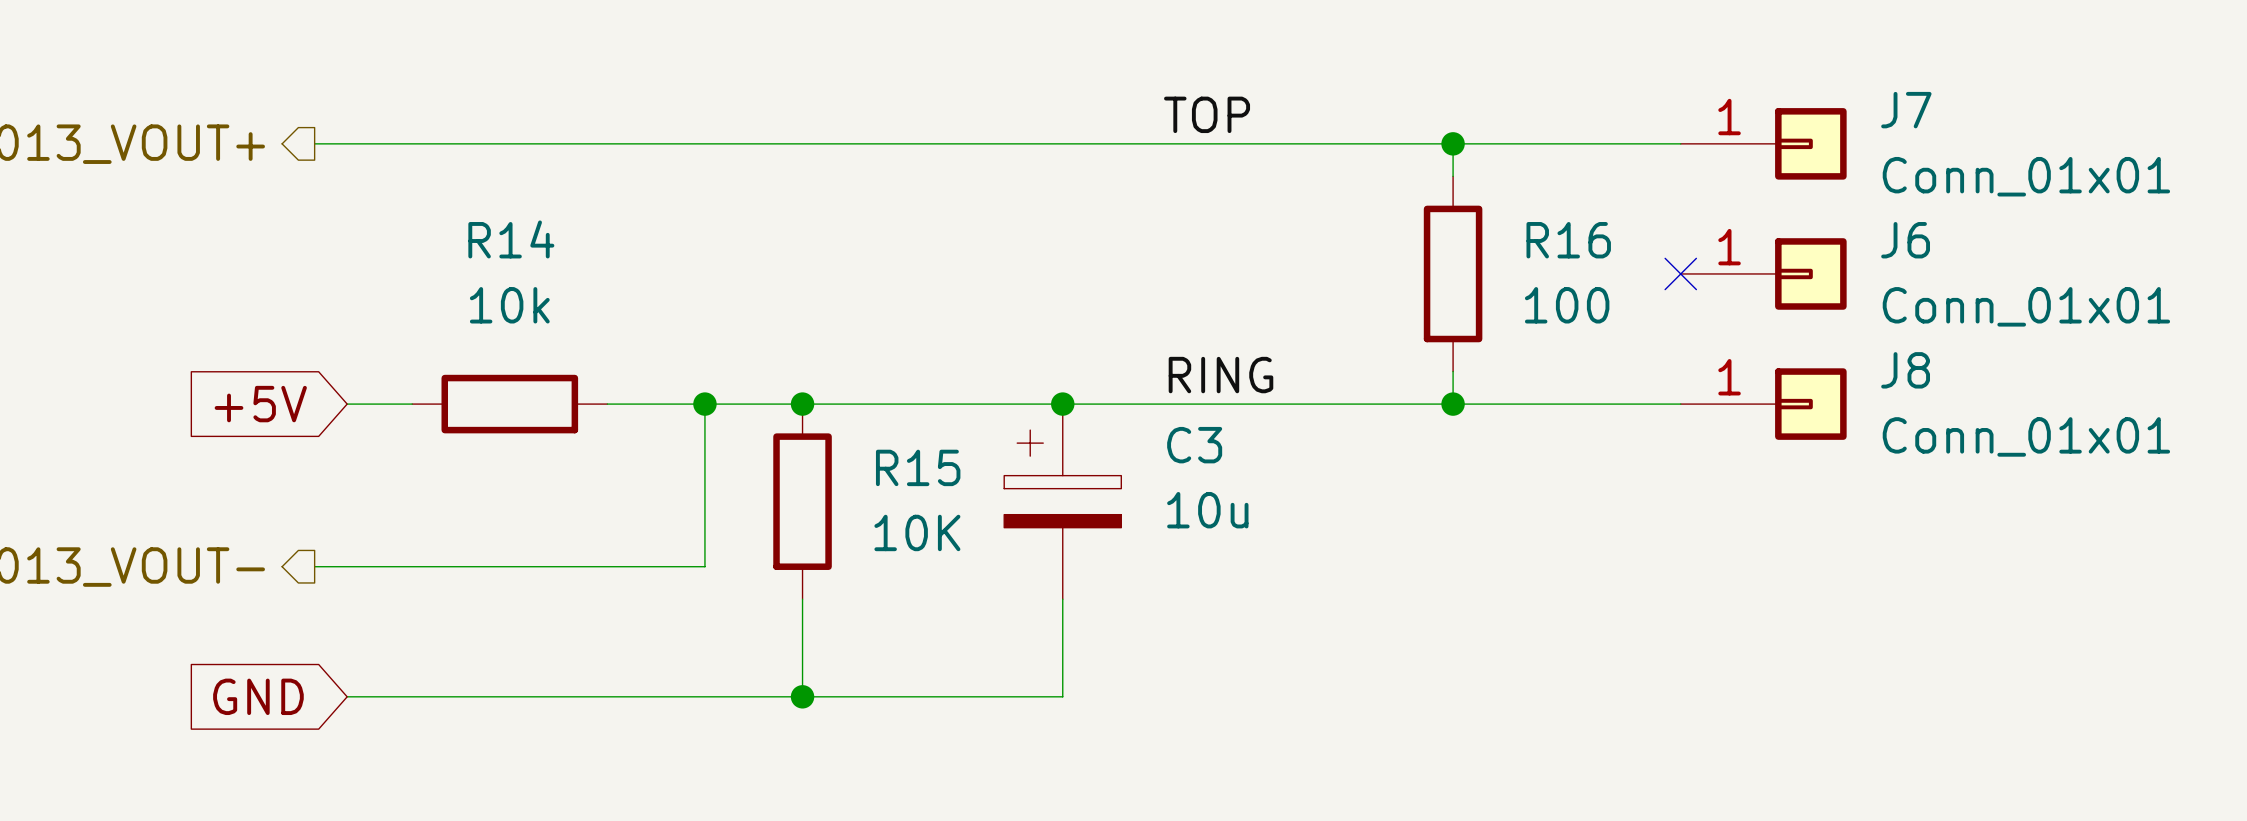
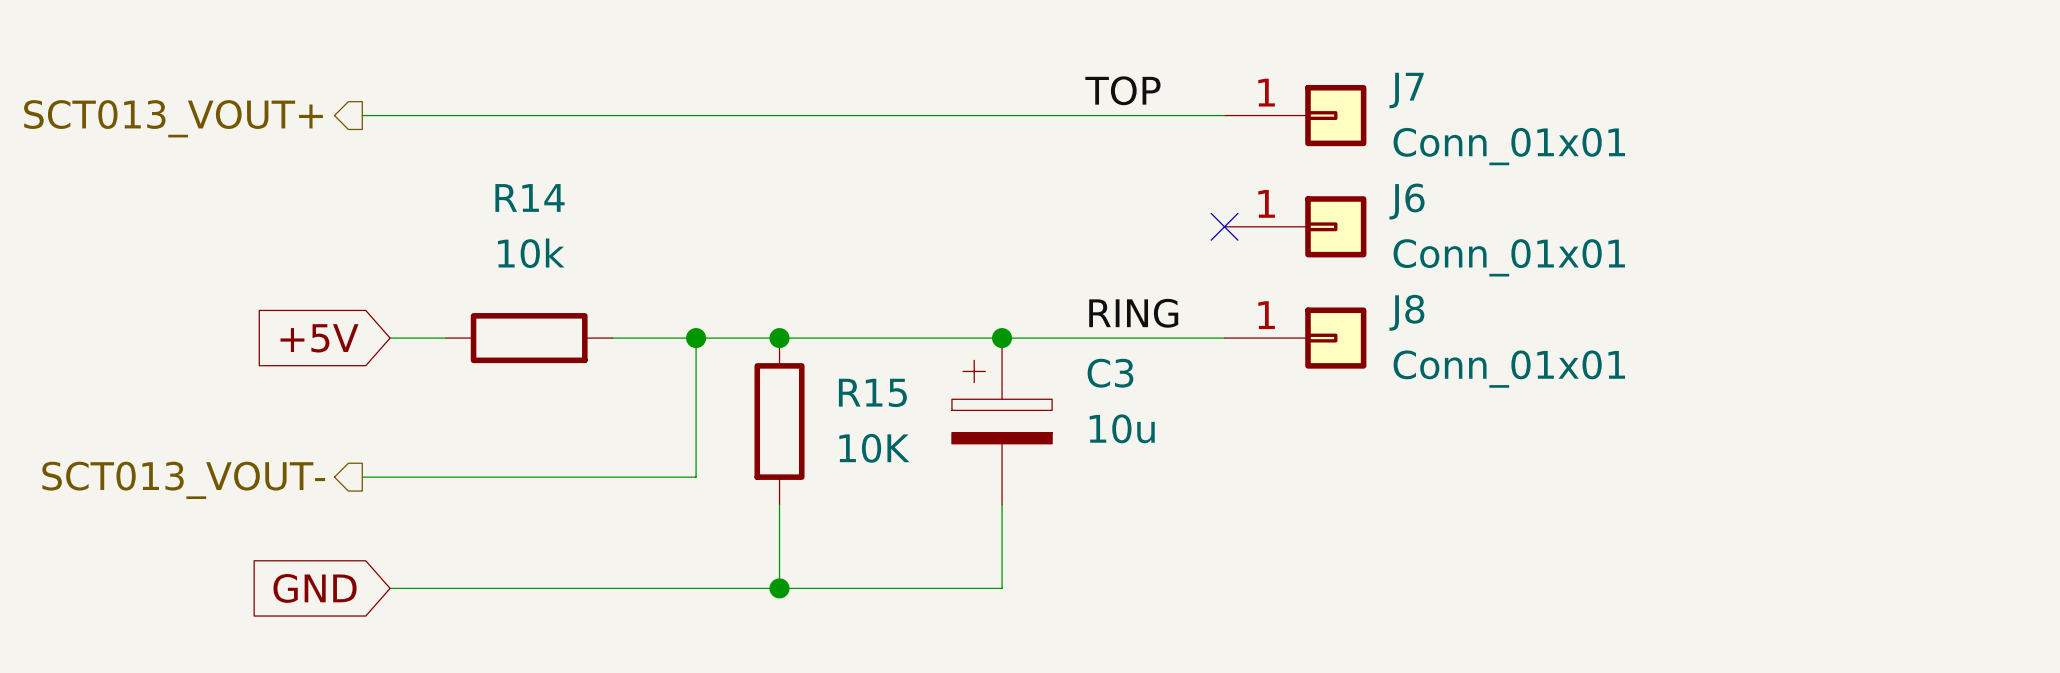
wire: (1322, 143) (1680, 143) -> none
junction: (1453, 143) -> none
J7 position: (1763, 143) -> (1295, 115)
no-connect mark: none -> (1224, 226)
R16: 100 (1453, 273) -> none
no-connect mark: (1680, 273) -> none
J6 position: (1763, 273) -> (1295, 226)
wire: (1322, 404) (1680, 404) -> none
junction: (1453, 404) -> none
J8 position: (1763, 404) -> (1295, 338)

